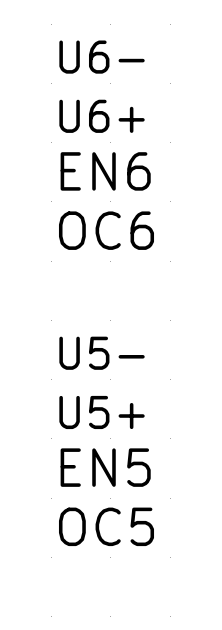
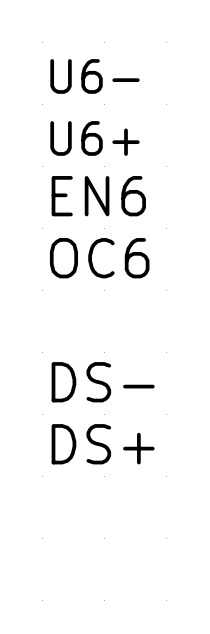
label: U5- (102, 353) -> DS- (103, 382)
label: U5+ (102, 412) -> DS+ (103, 444)
label: EN5 (105, 467) -> none
label: OC5 (106, 526) -> none

